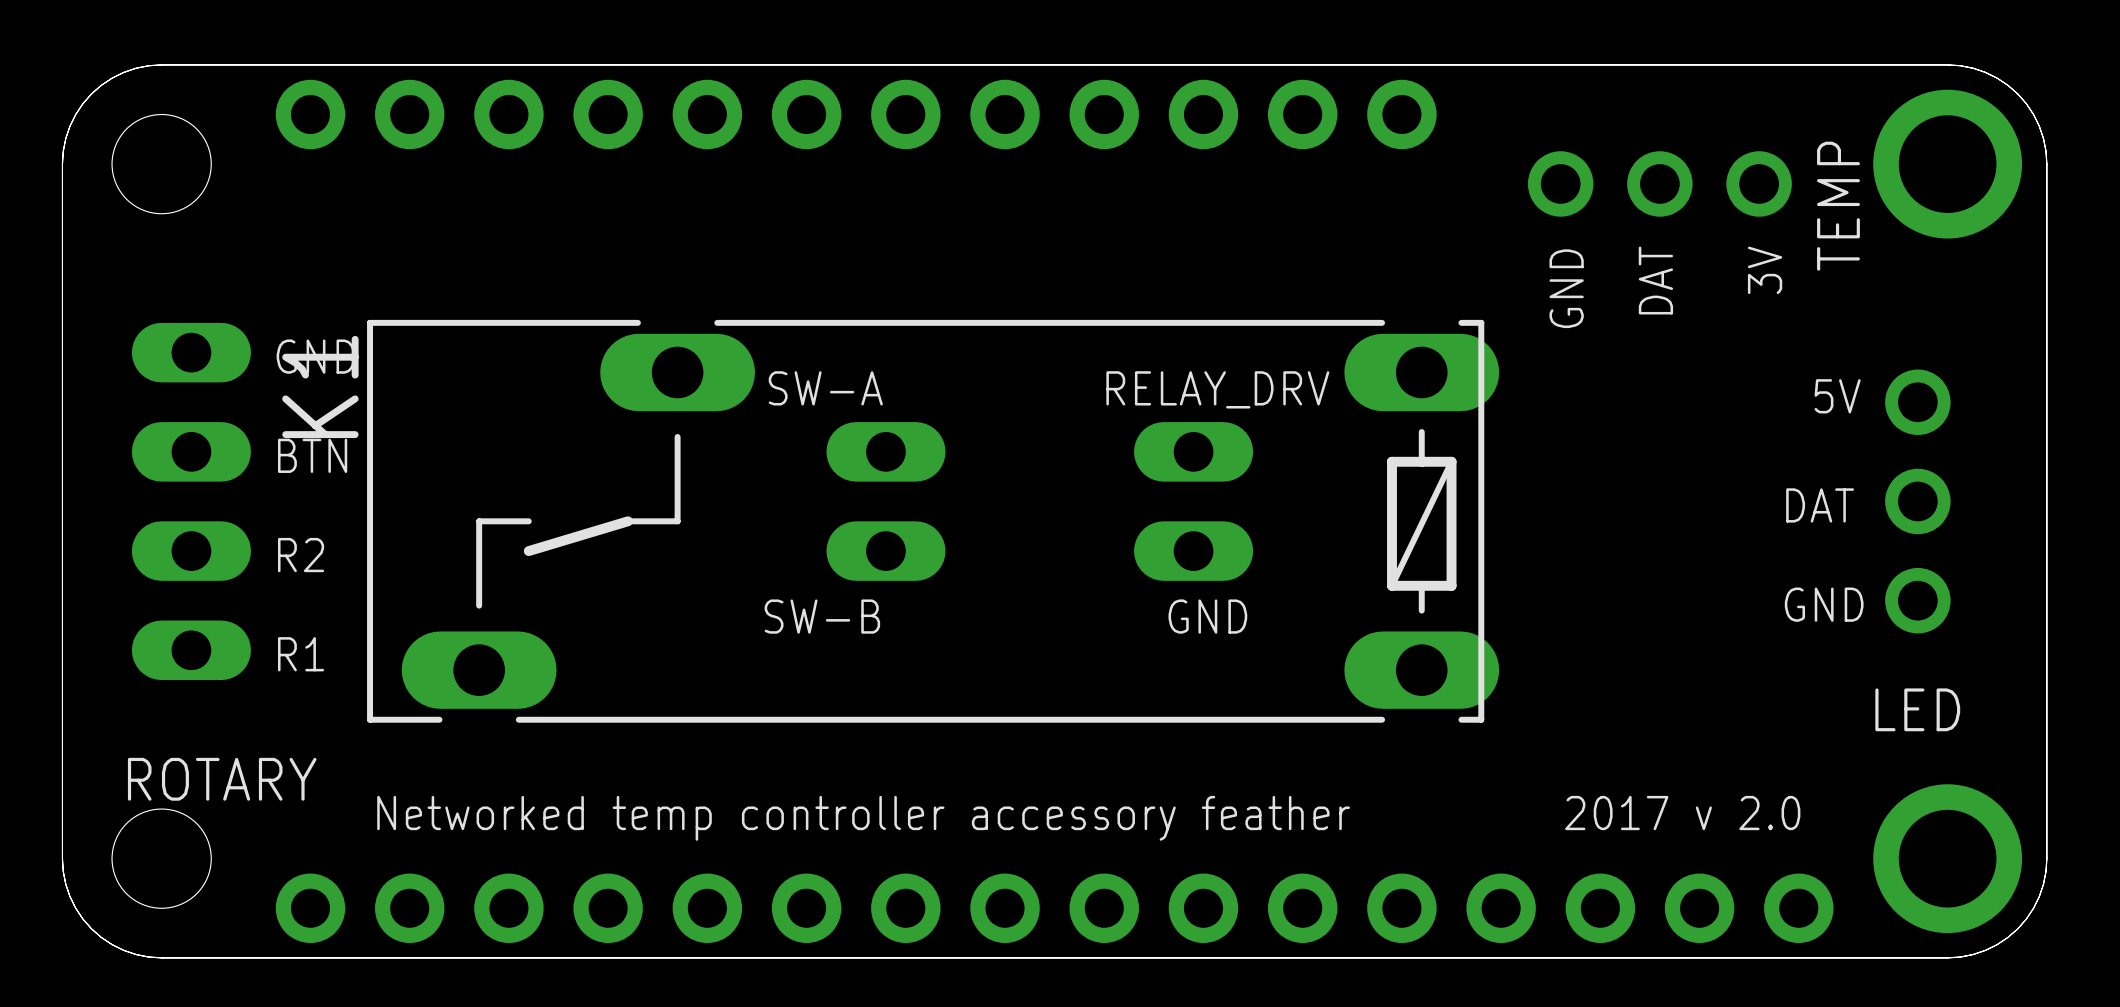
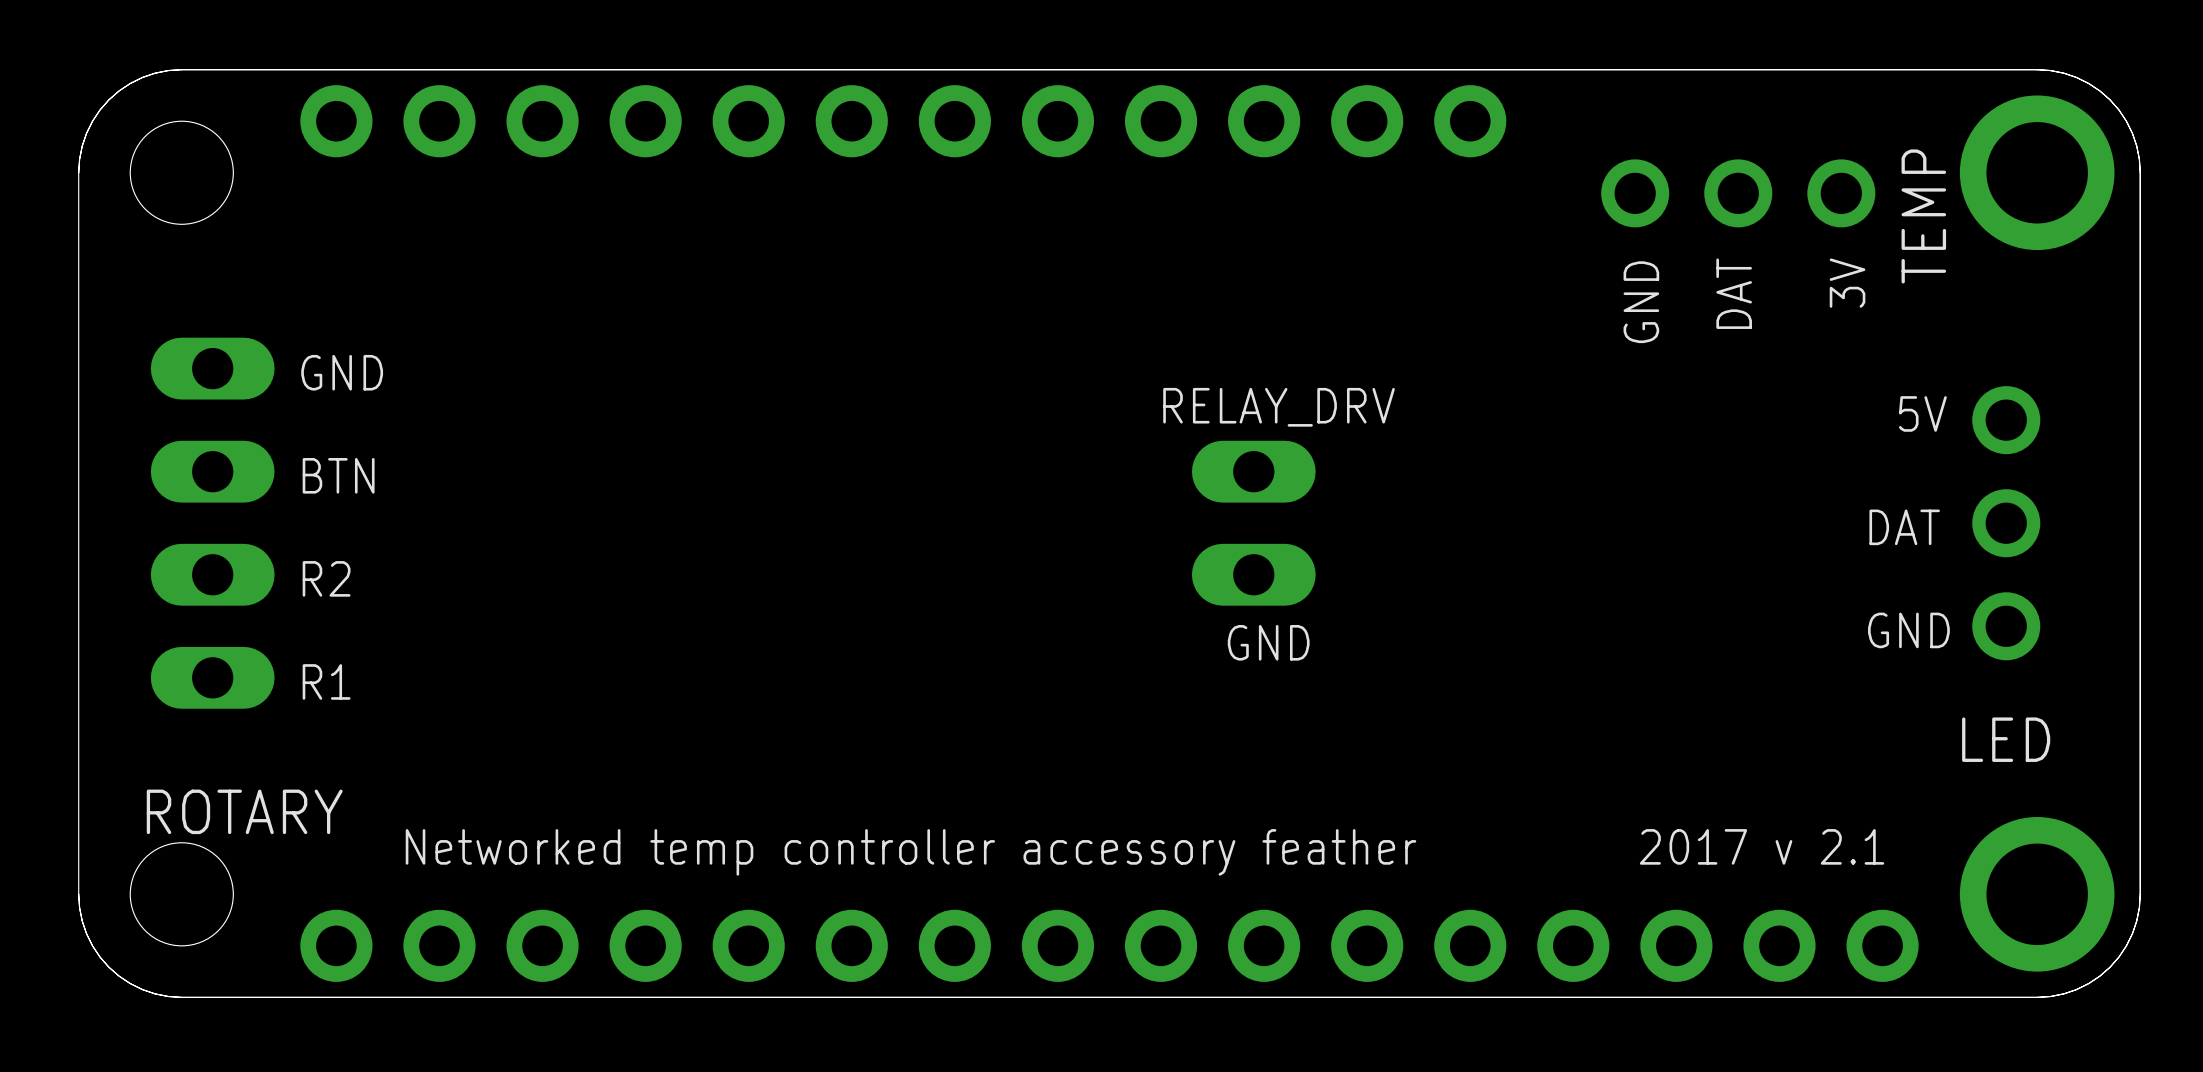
text: SW-A (825, 388) -> none
part: (885, 501) -> none
K1: (933, 521) -> none
text: SW-B (822, 616) -> none
text: 2017 v 2.0 (1682, 813) -> 2017 v 2.1 (1762, 846)

